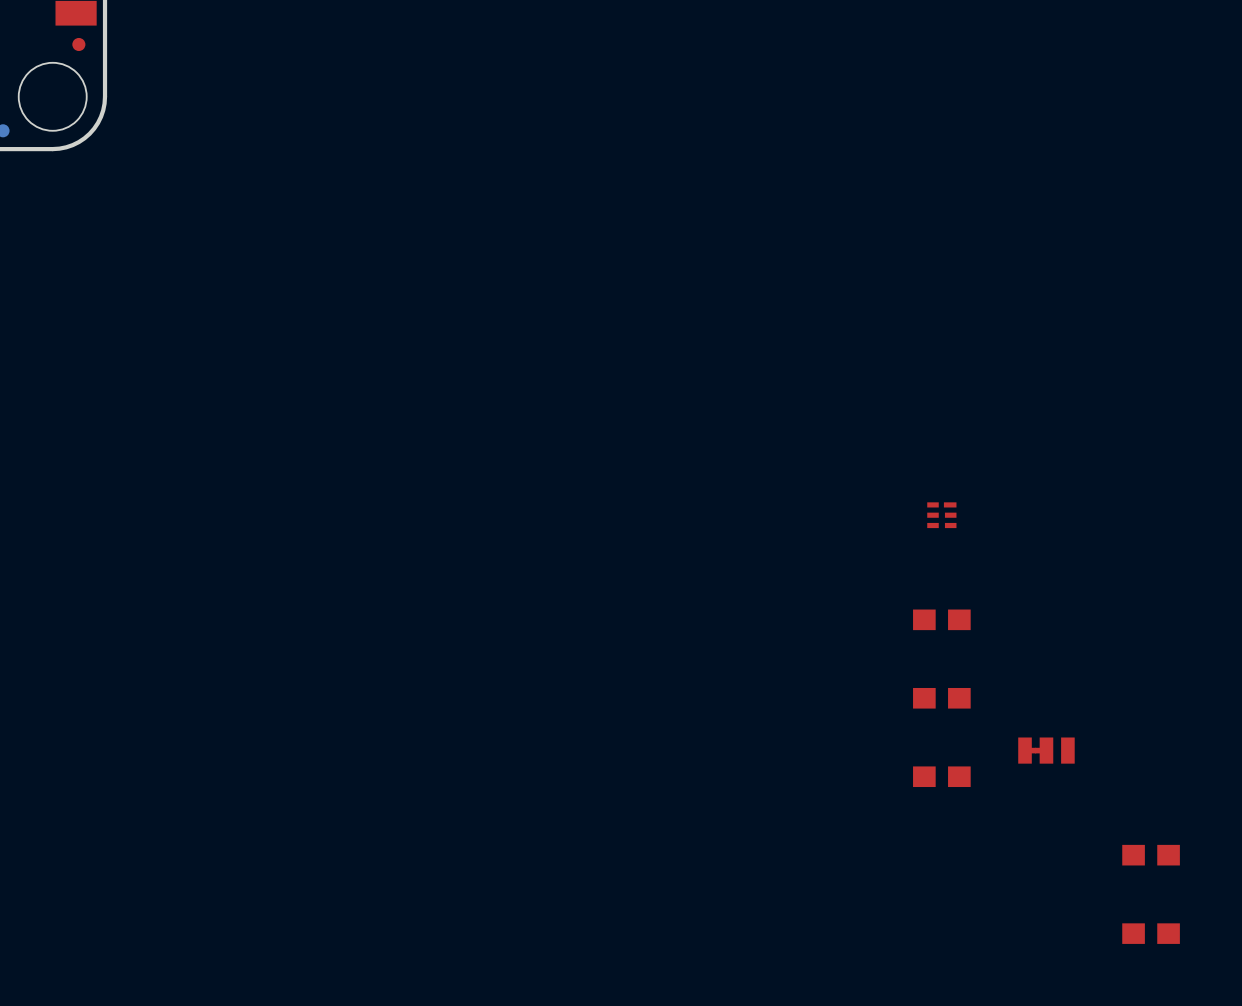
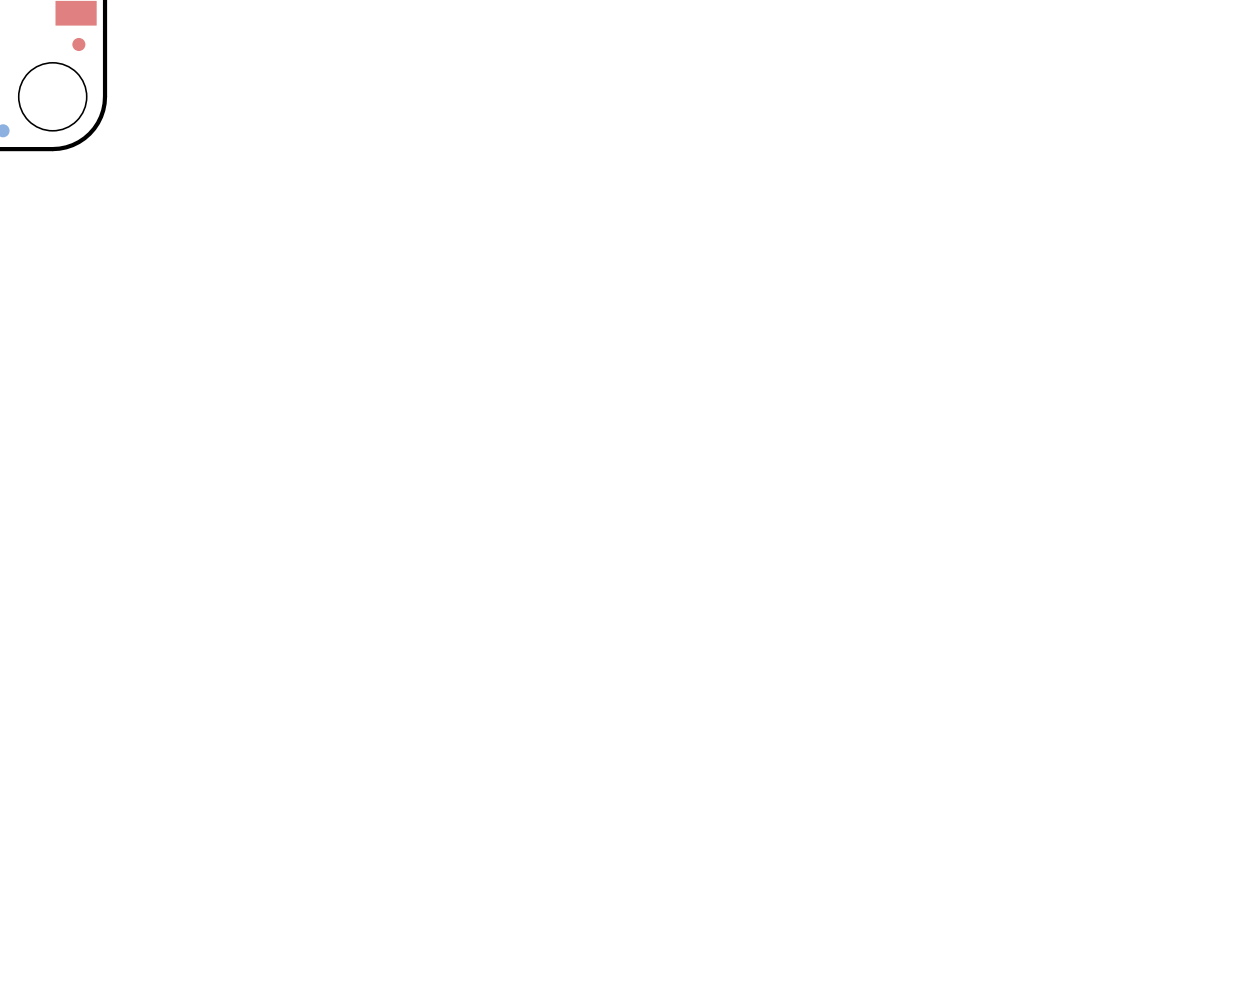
part: (941, 515) -> none
part: (941, 619) -> none
part: (941, 698) -> none
part: (1046, 750) -> none
part: (941, 776) -> none
part: (1151, 855) -> none
part: (1151, 933) -> none

